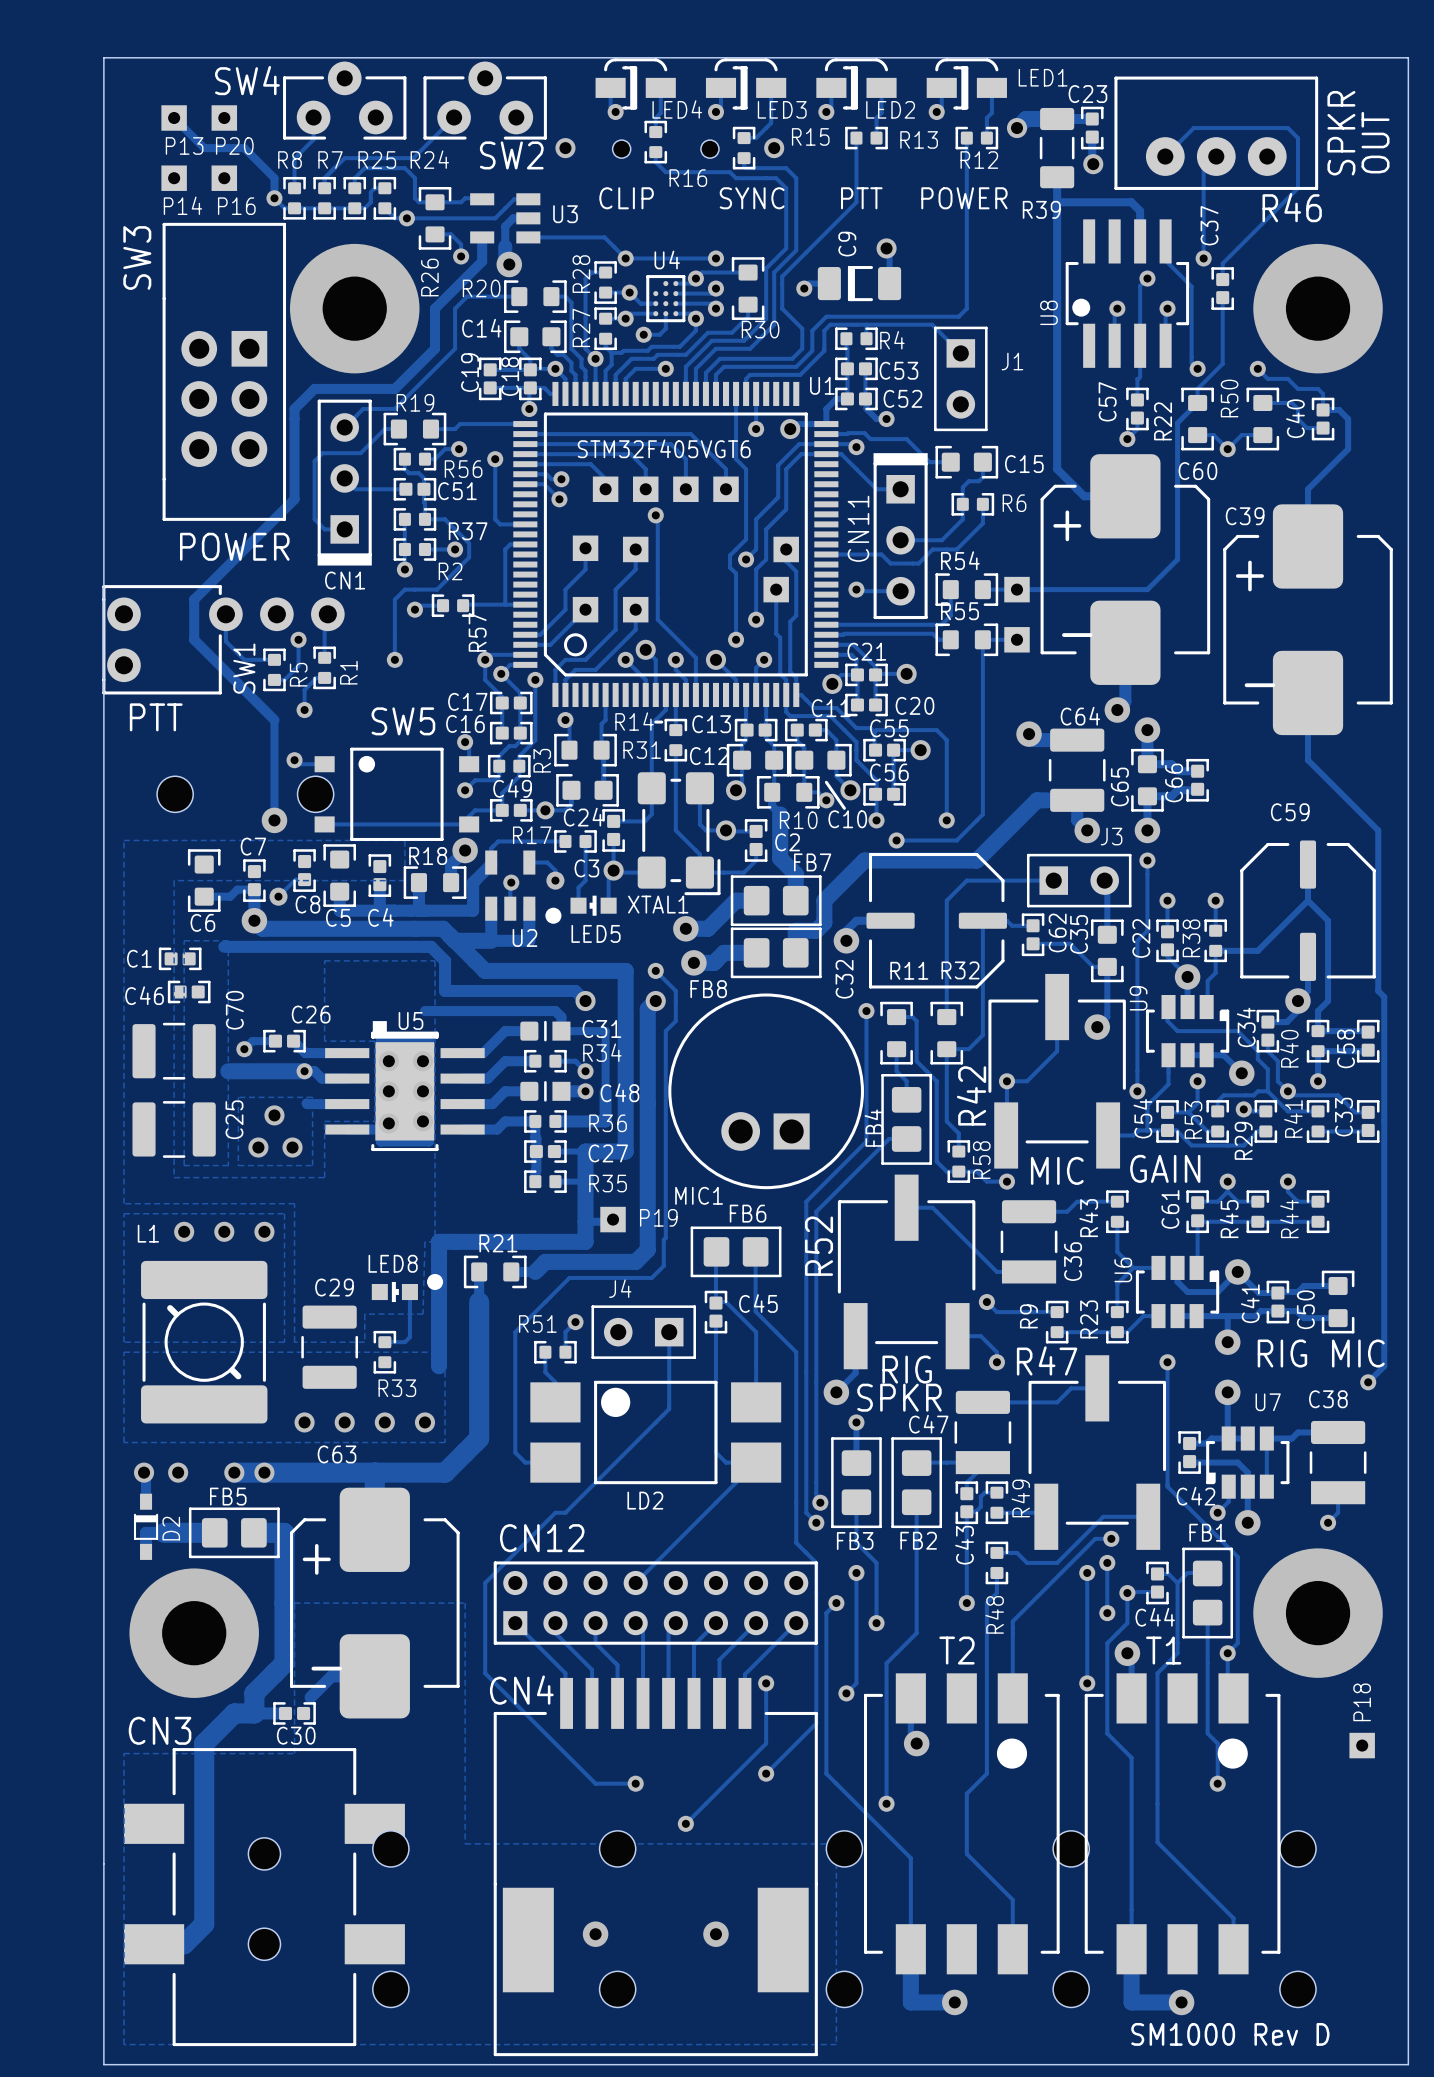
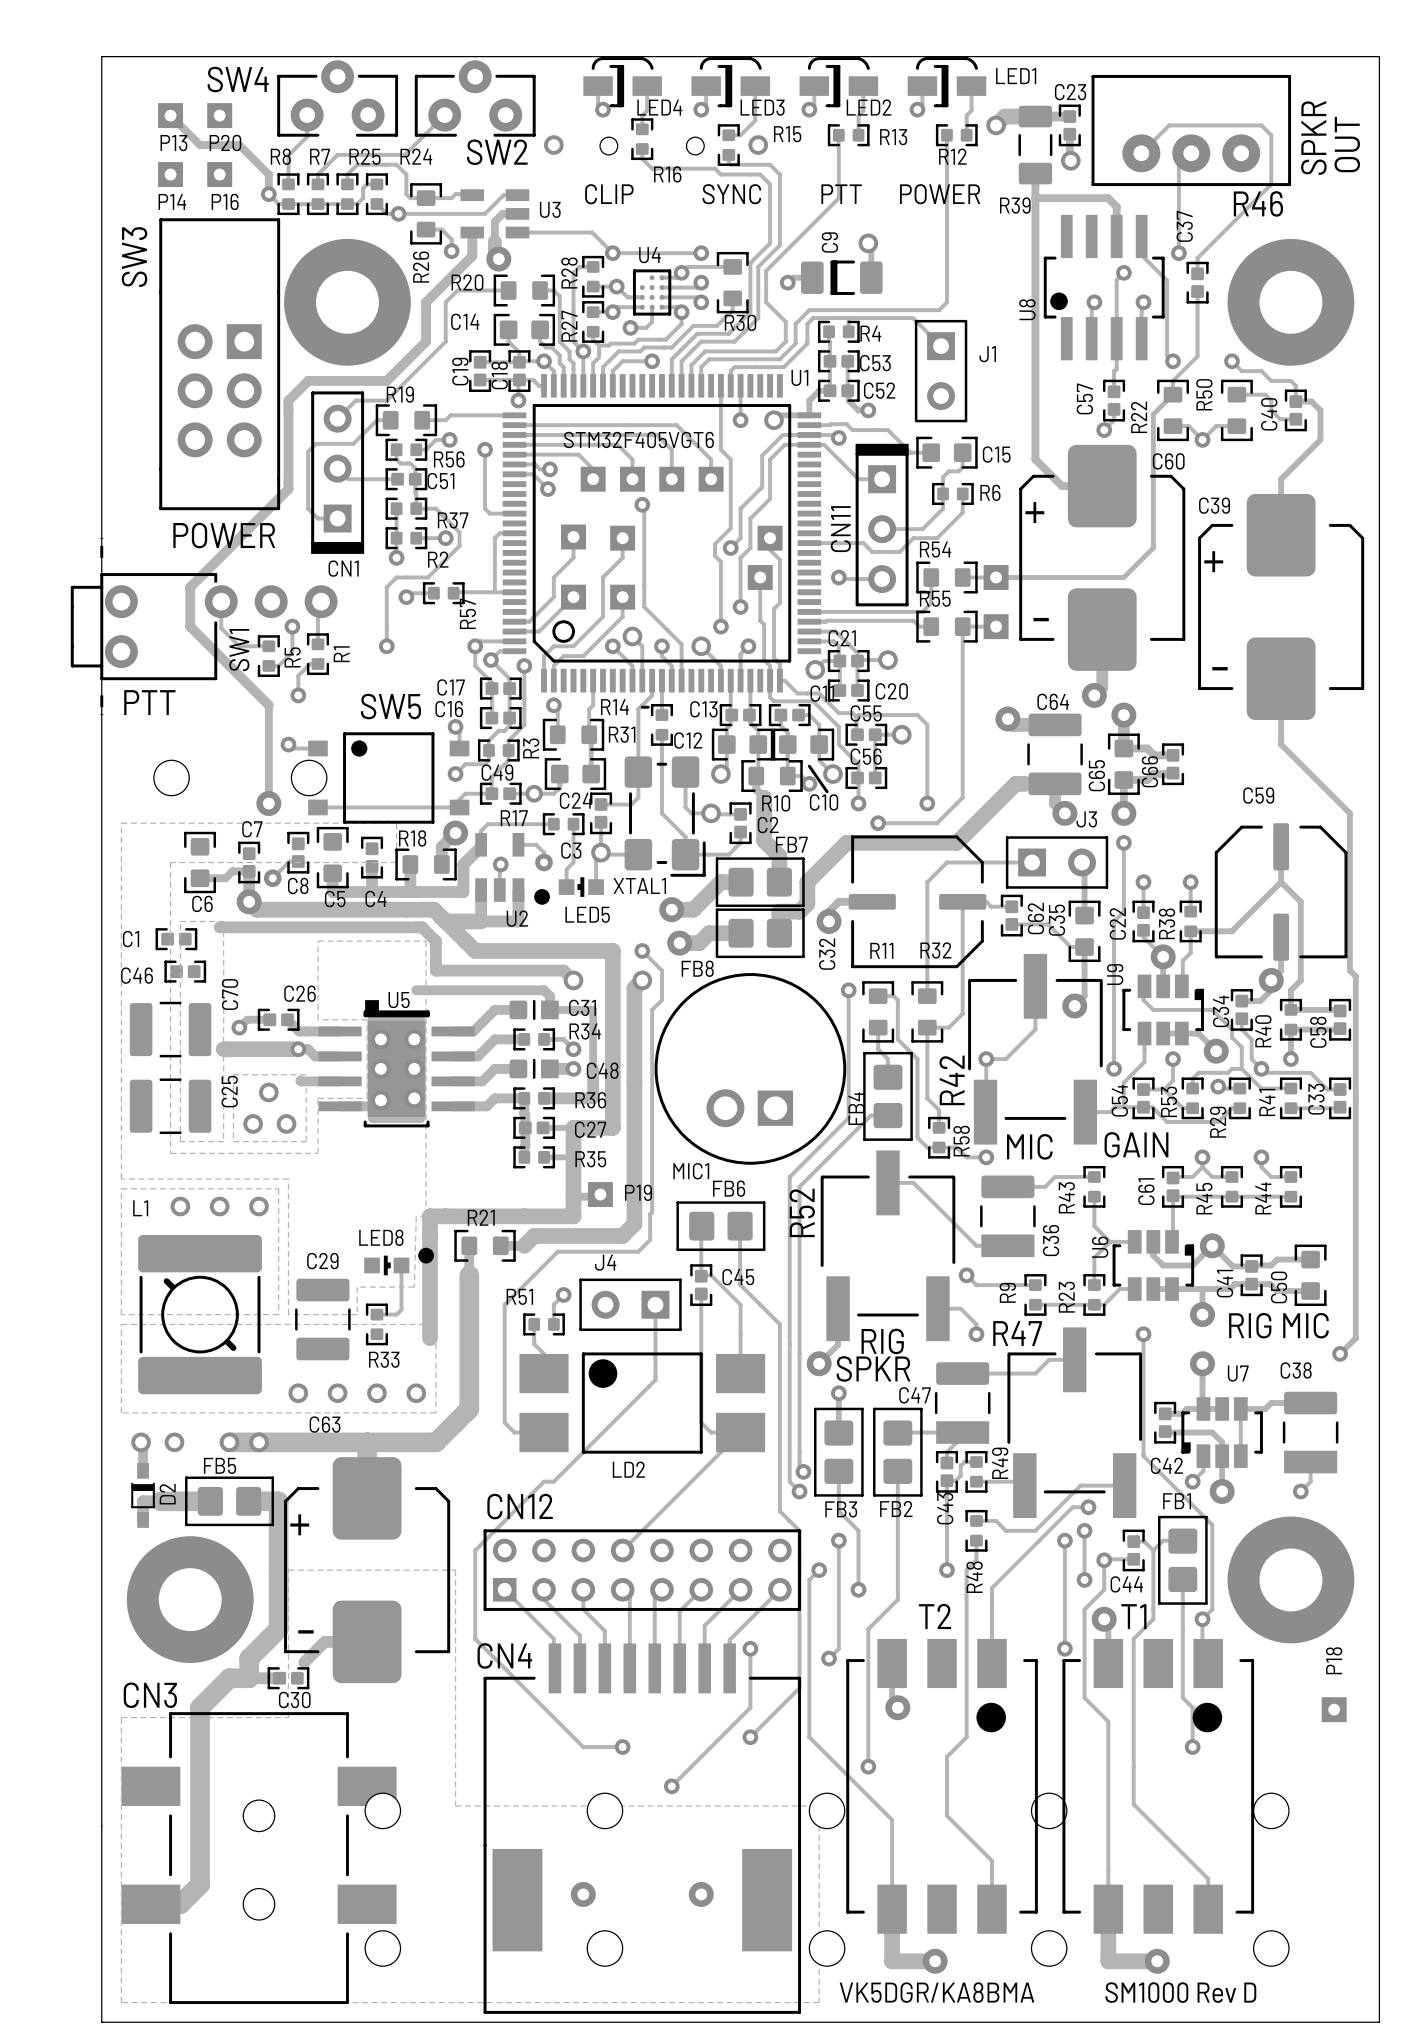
SW1 footprint: [102, 585, 345, 695] -> [70, 536, 338, 717]
text: none -> VK5DGR/KA8BMA (937, 1992)

